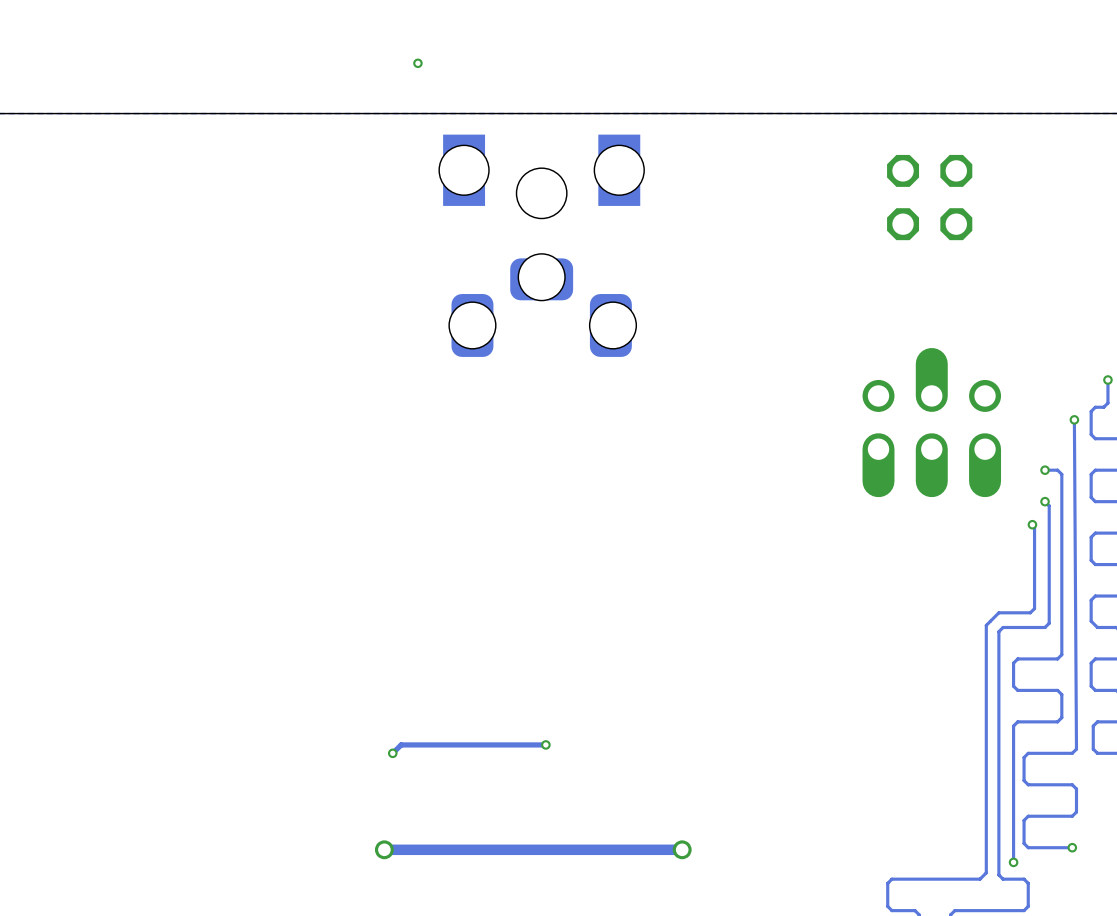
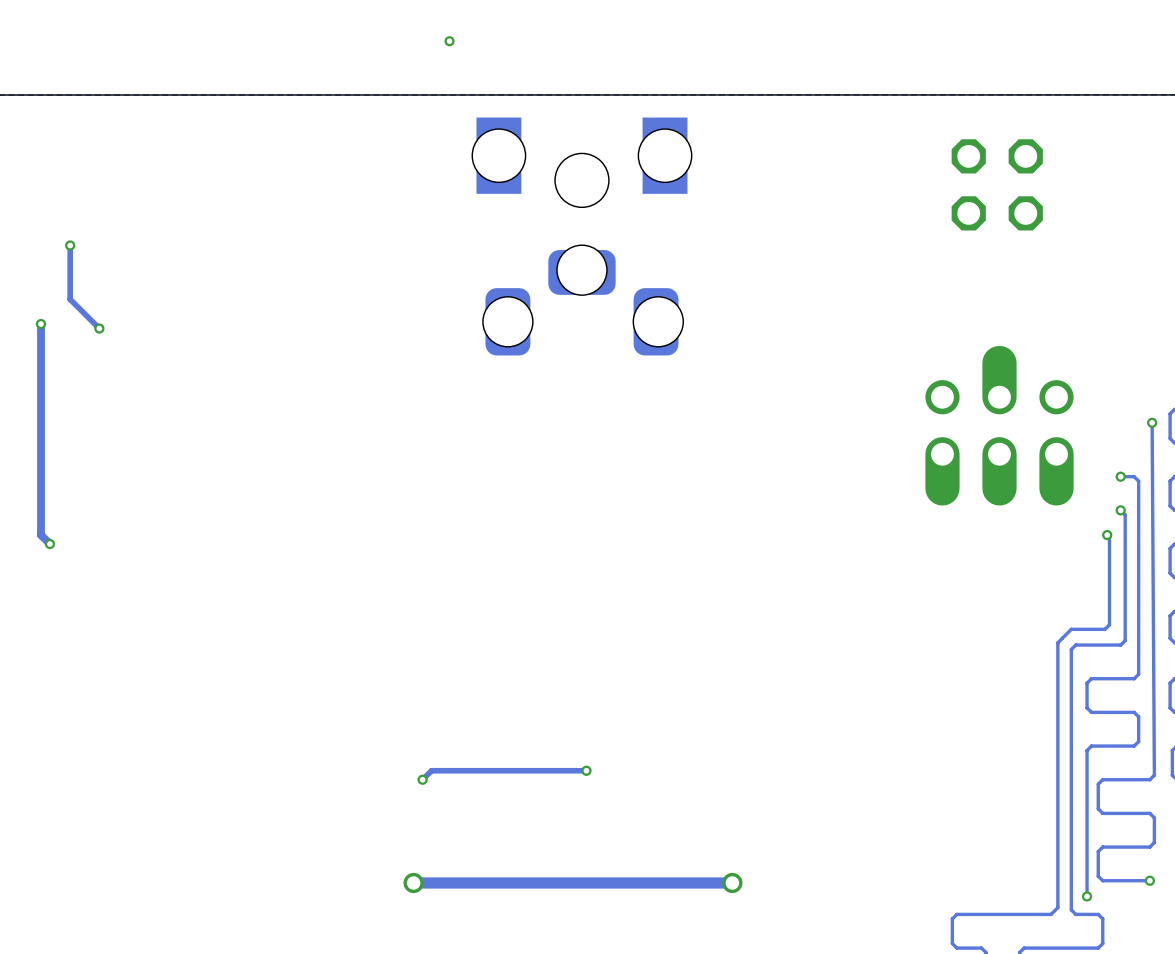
track: none -> (70, 245) (70, 299) (99, 328)
via: none -> (70, 245)
track: none -> (41, 324) (41, 535) (49, 544)
via: none -> (41, 324)
via: none -> (99, 328)
via: none -> (49, 544)

